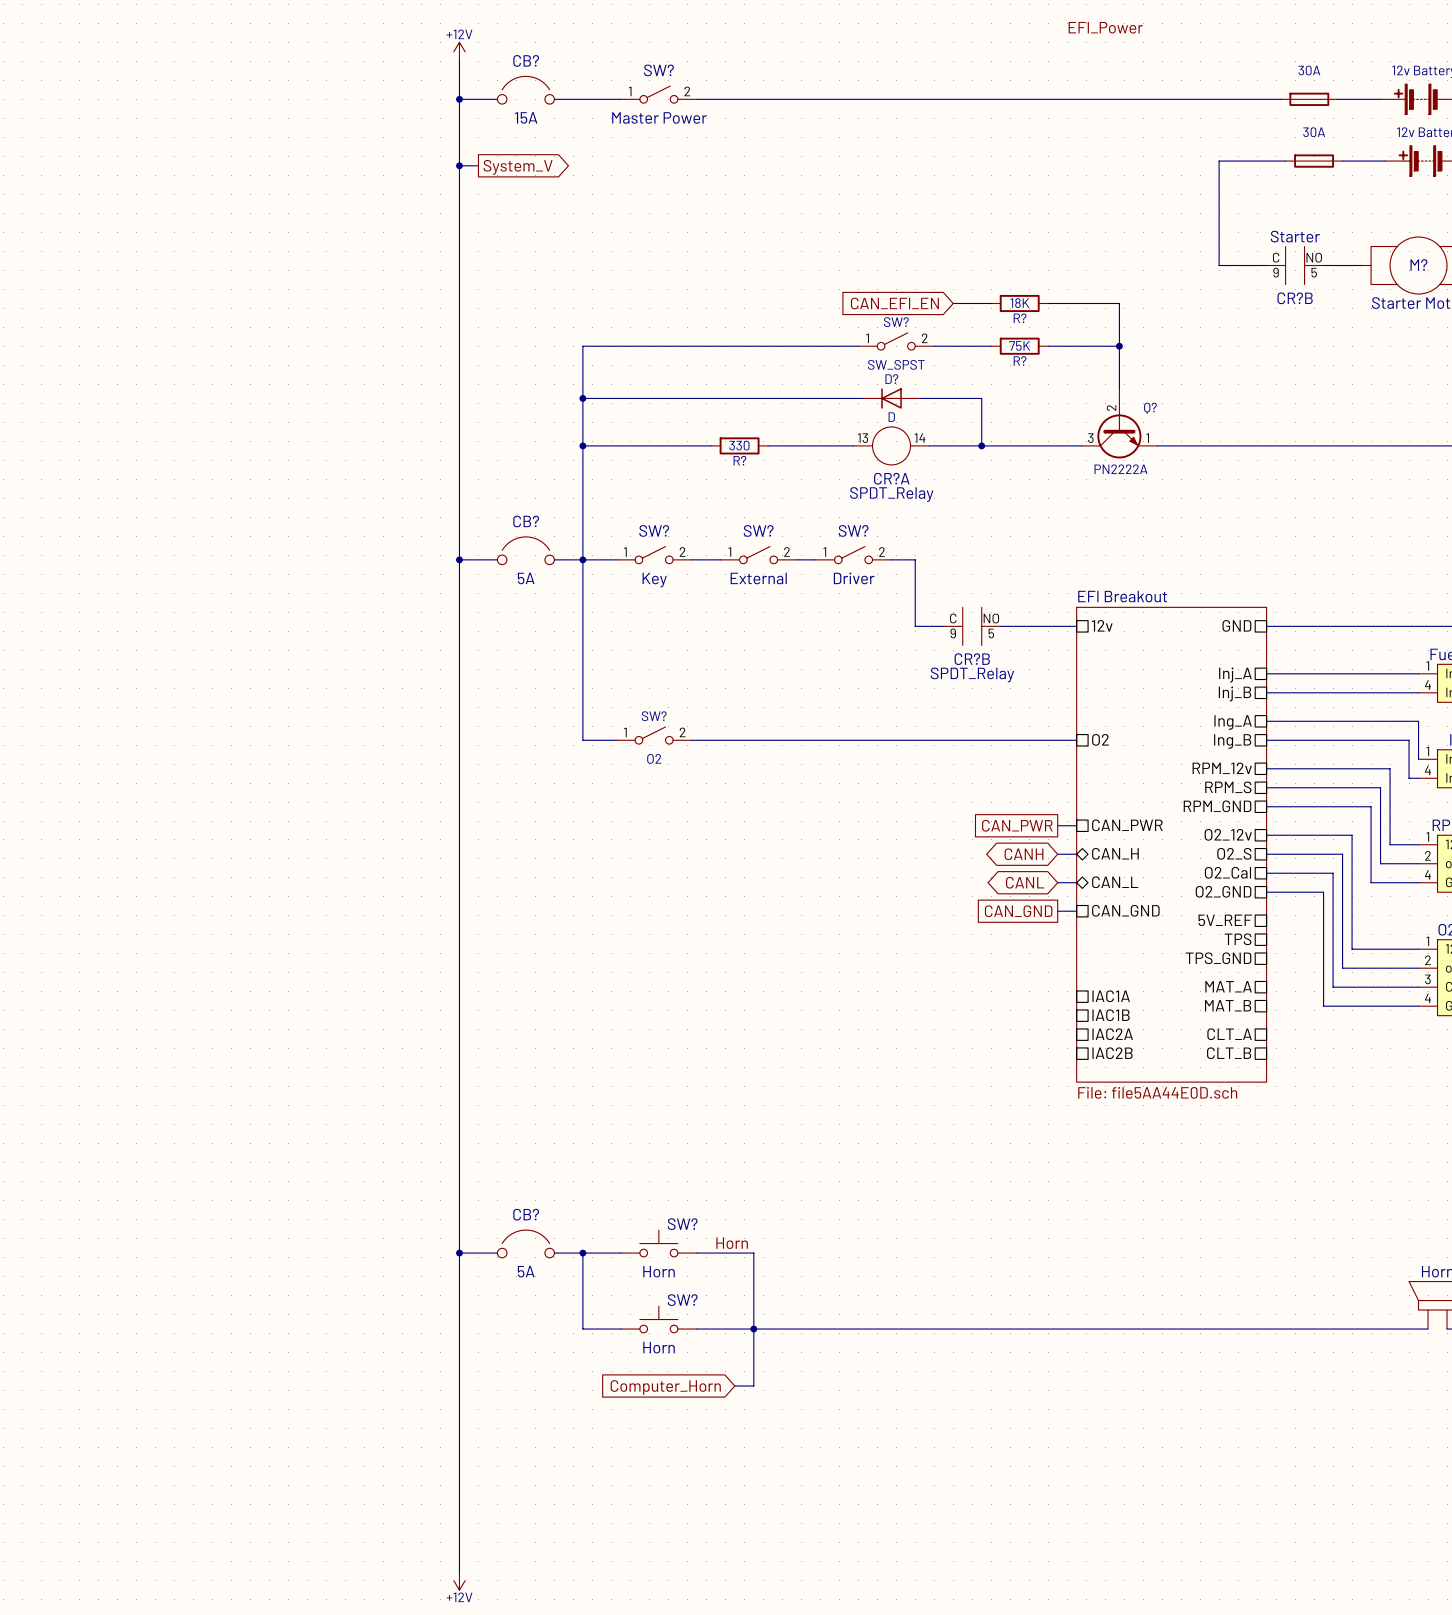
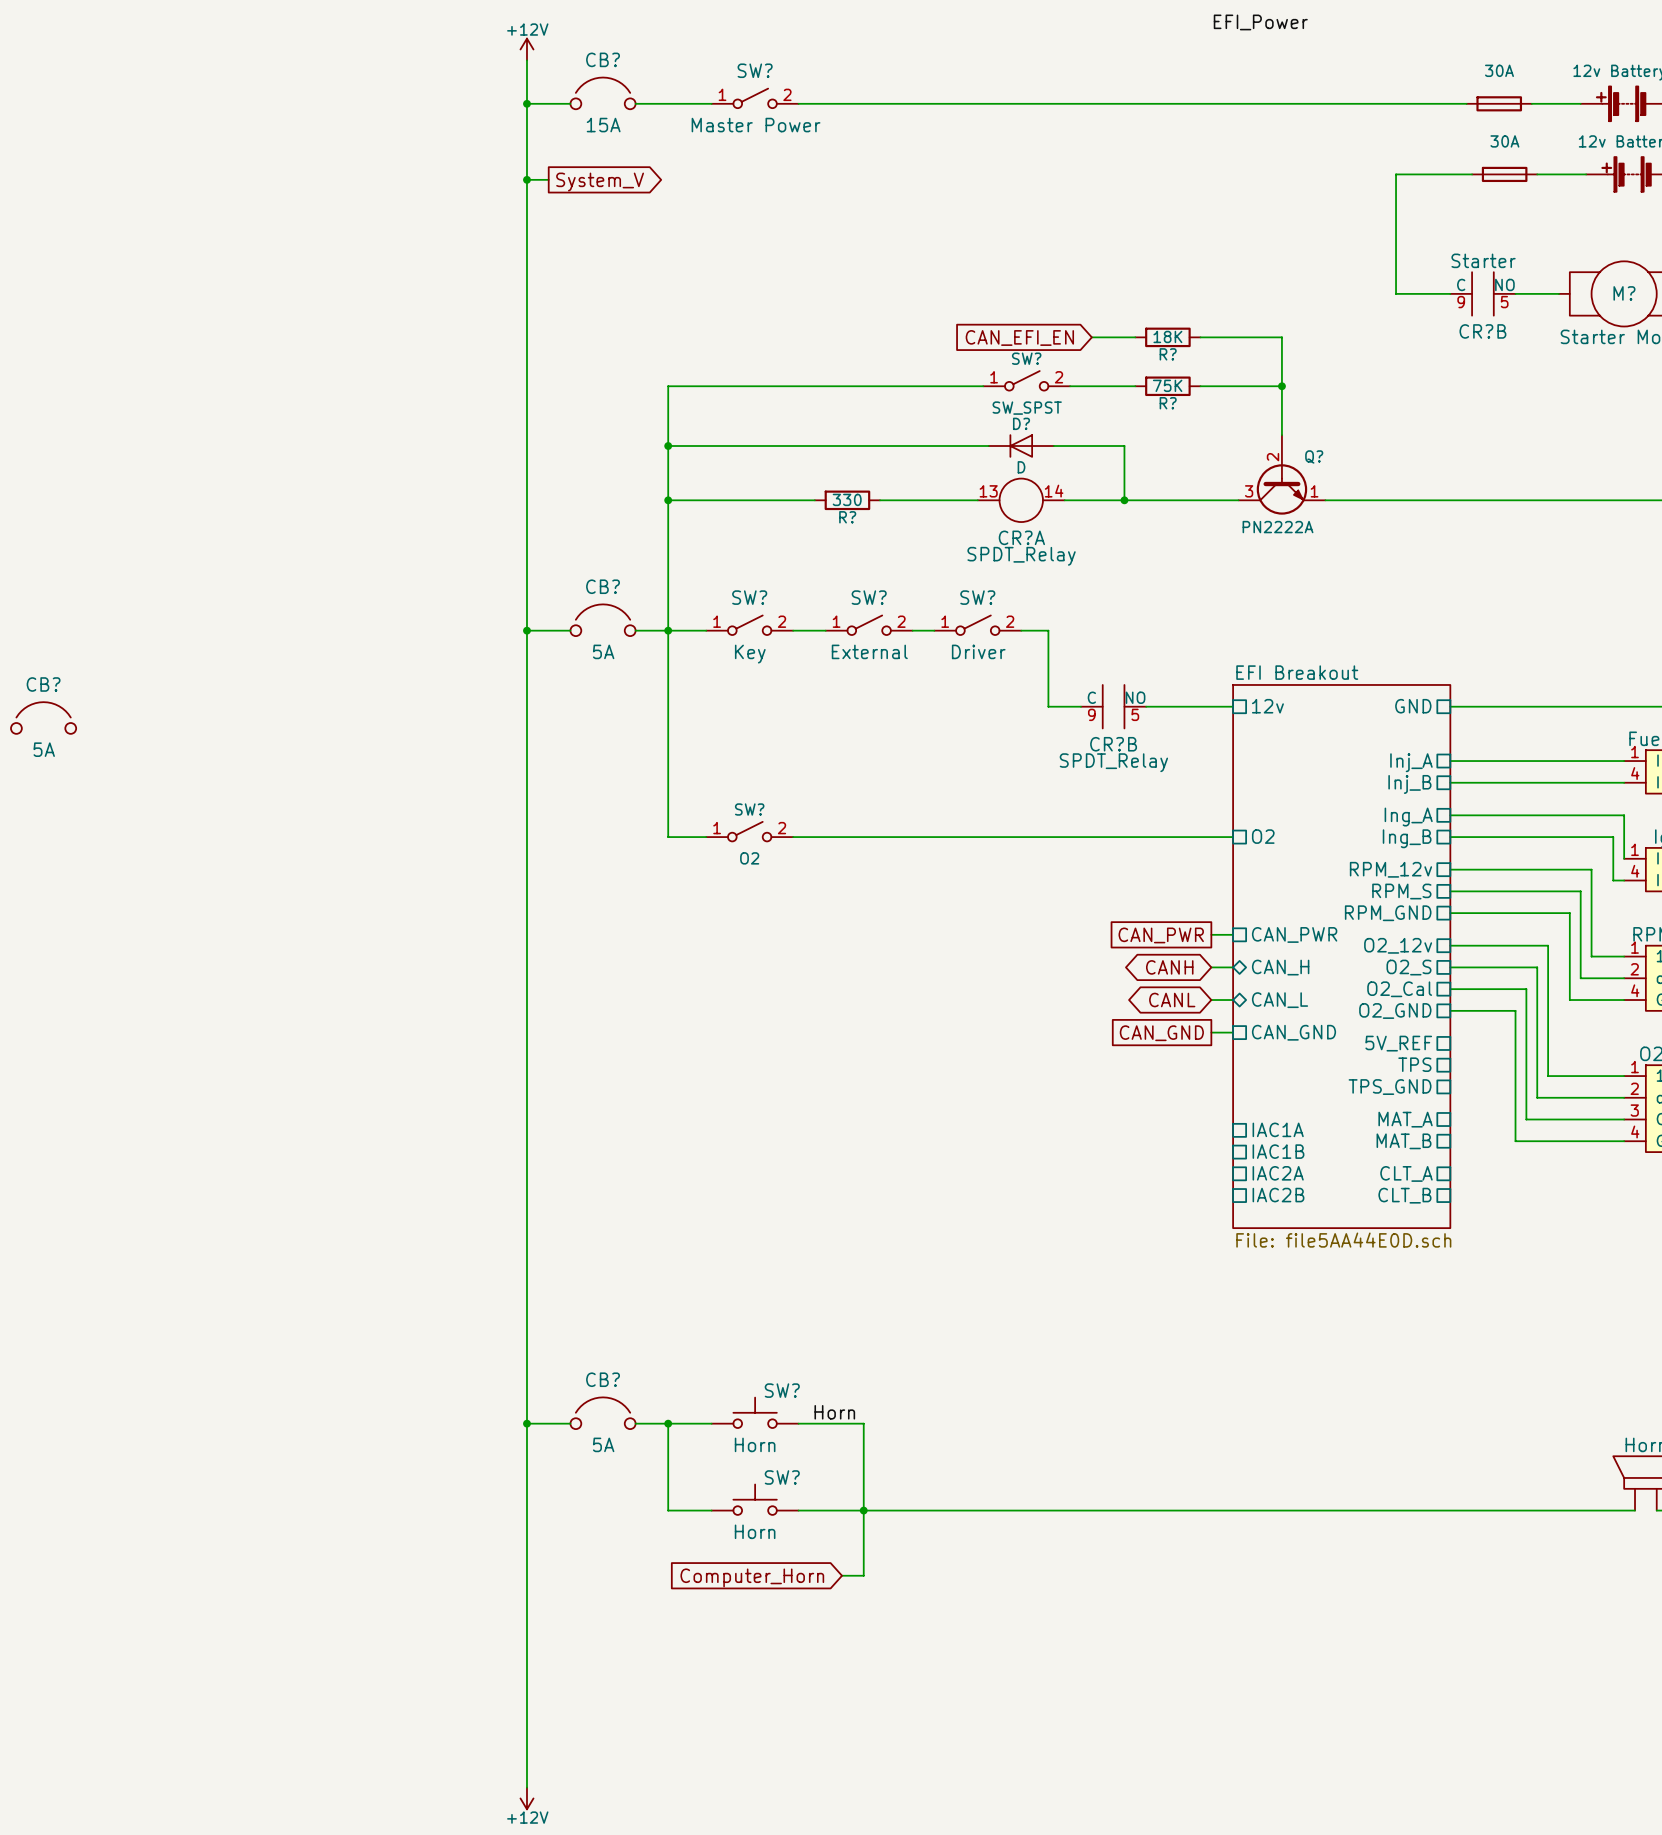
CB?: none -> 5A (43, 718)

